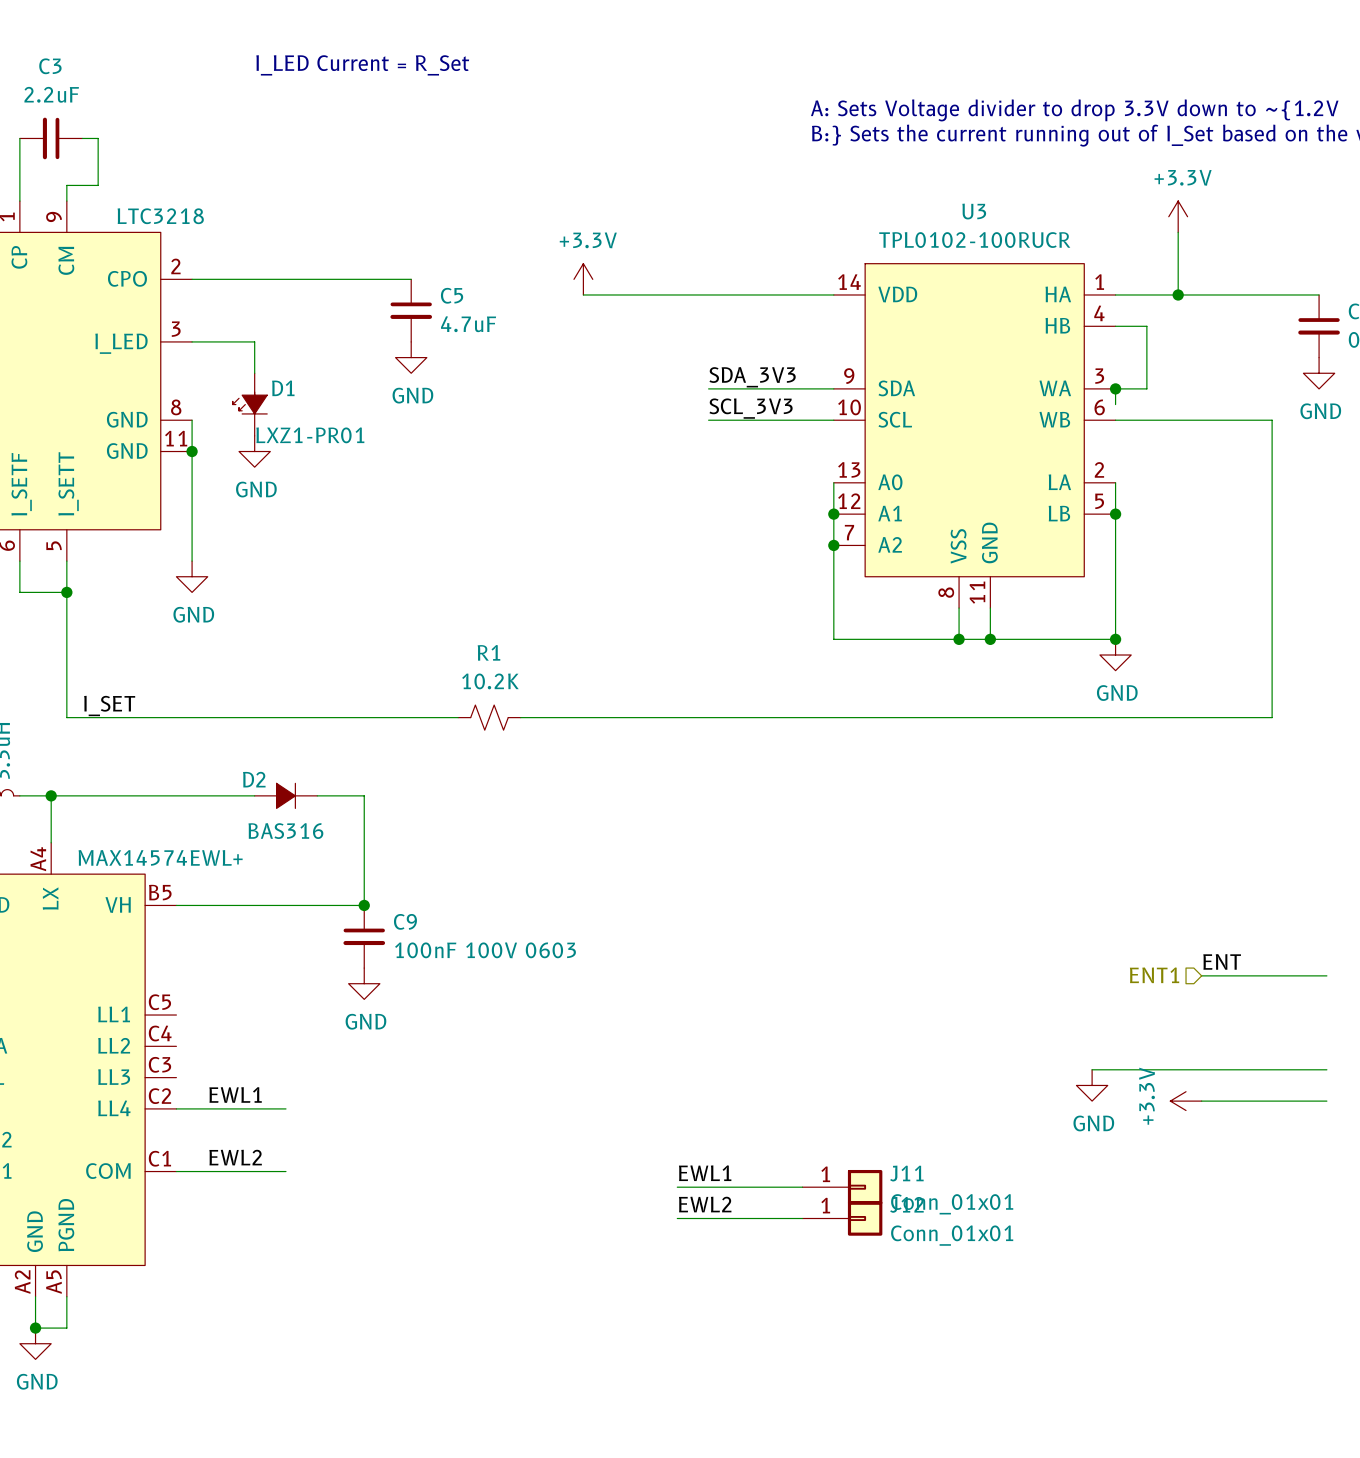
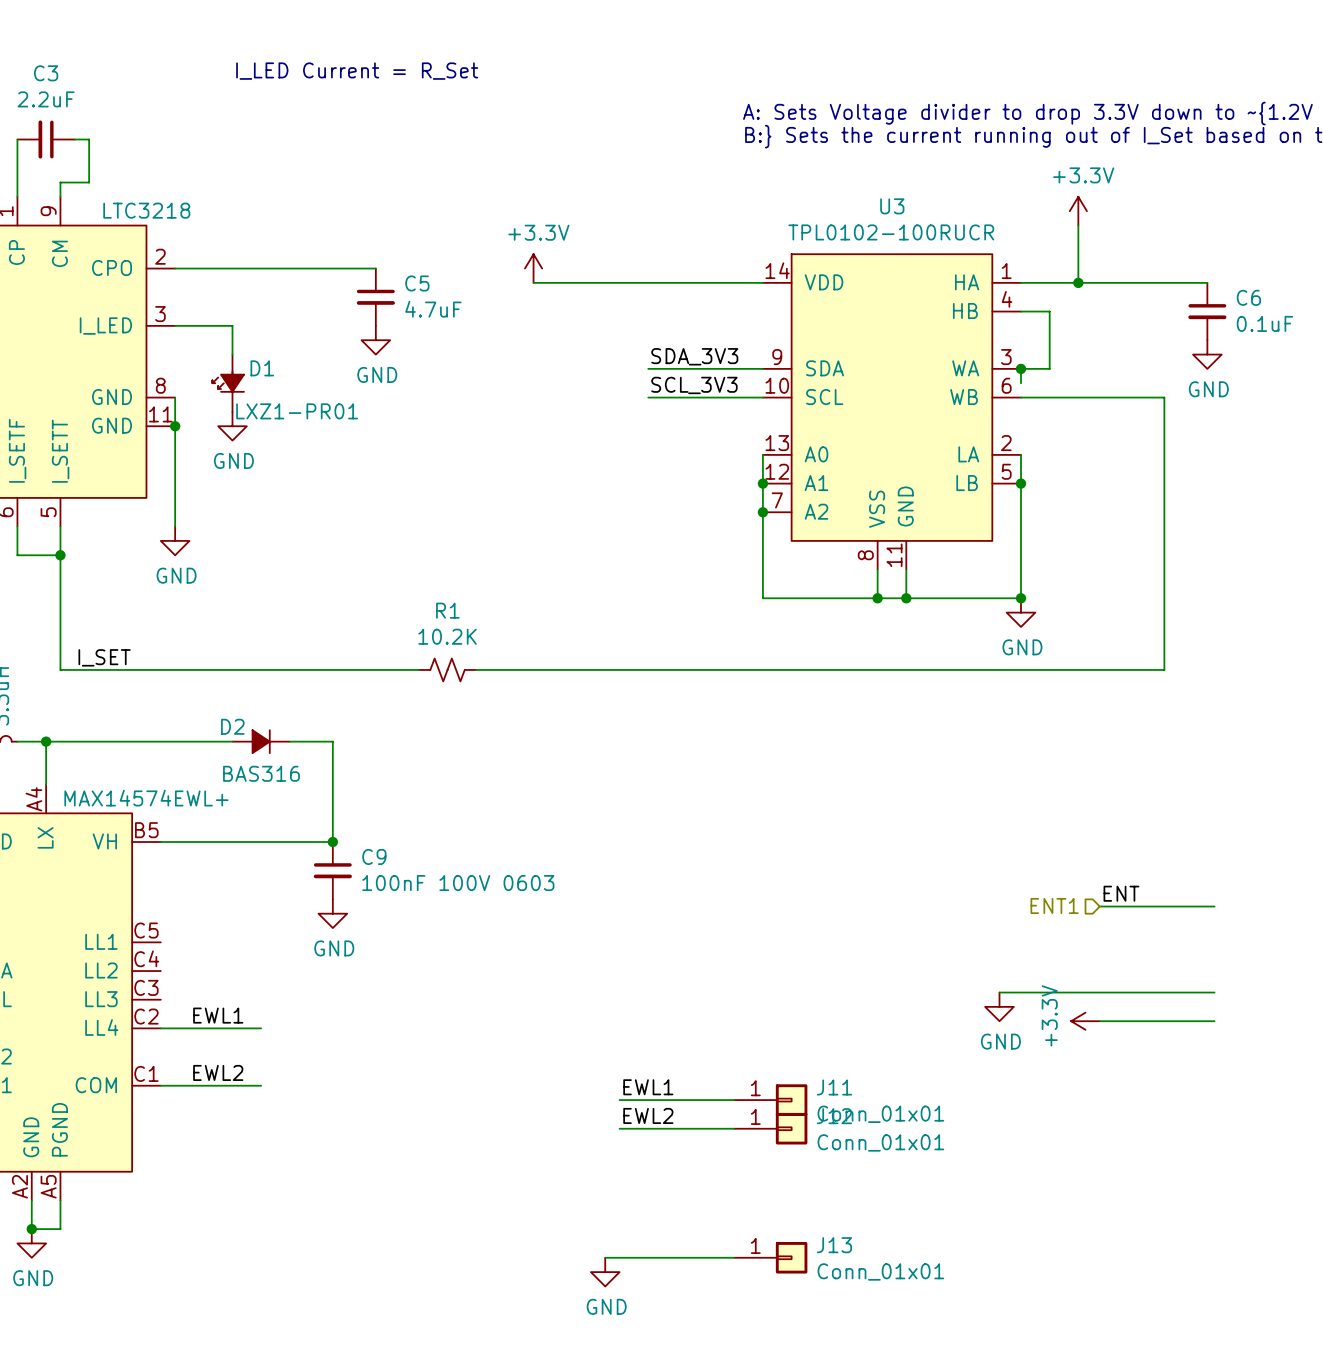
wire: none -> (605, 1257) (734, 1257)
J13: none -> Conn_01x01 (770, 1257)
power symbol: none -> GND (605, 1272)

